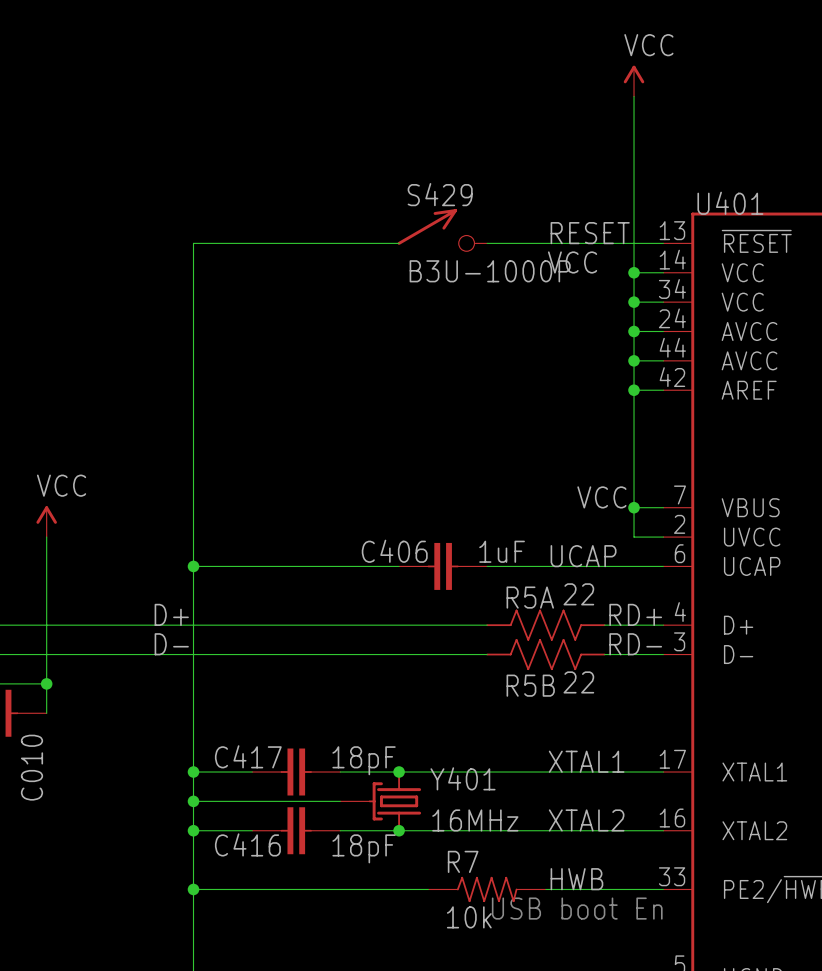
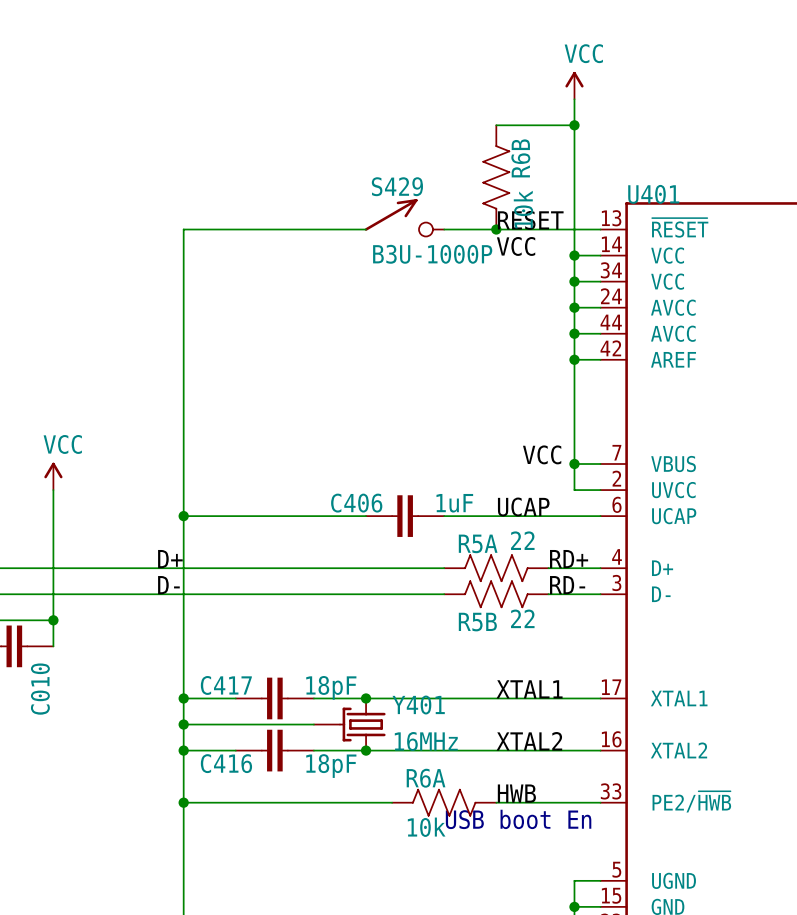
wire: none -> (496, 125) (574, 125)
junction: none -> (574, 125)
R6B: none -> 10k (496, 177)
junction: none -> (496, 229)
R7: 10k (487, 889) -> none
R6A: none -> 10k (444, 802)

